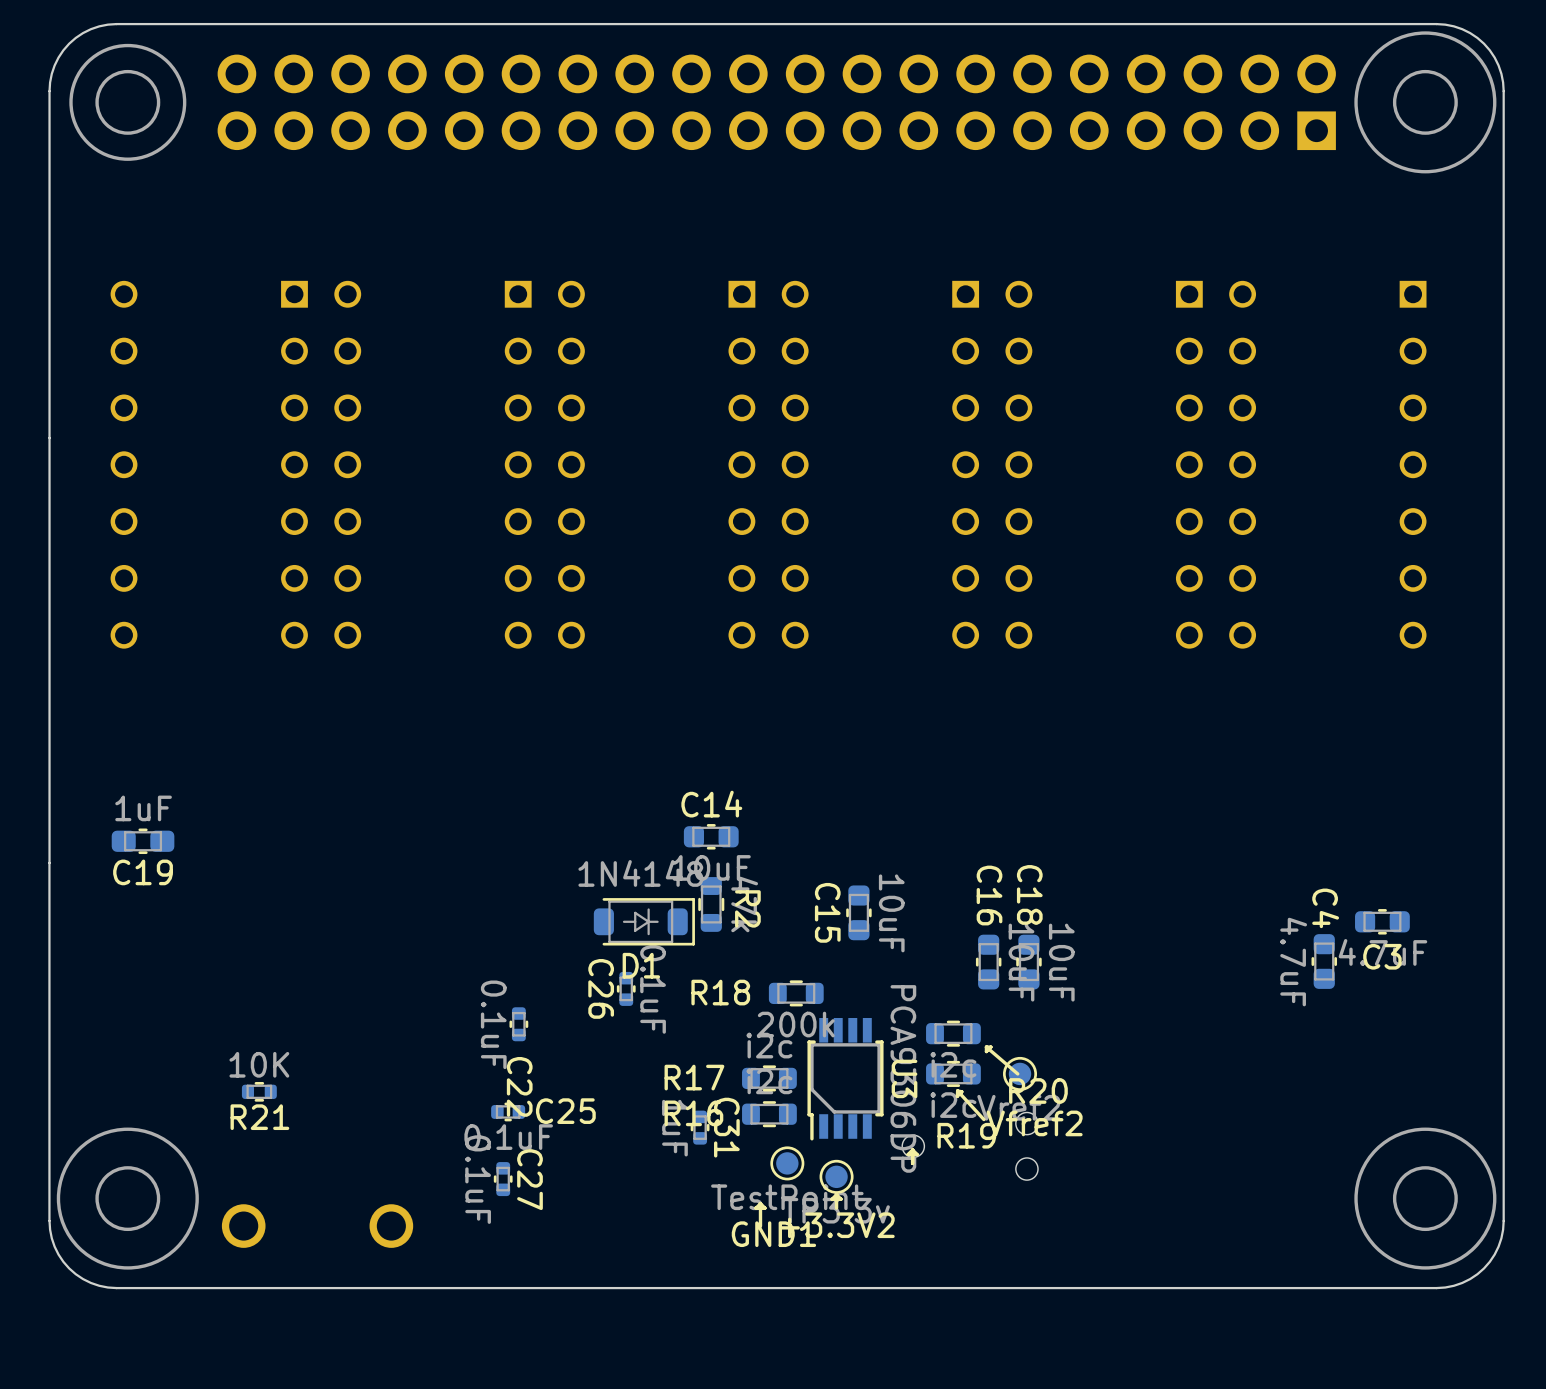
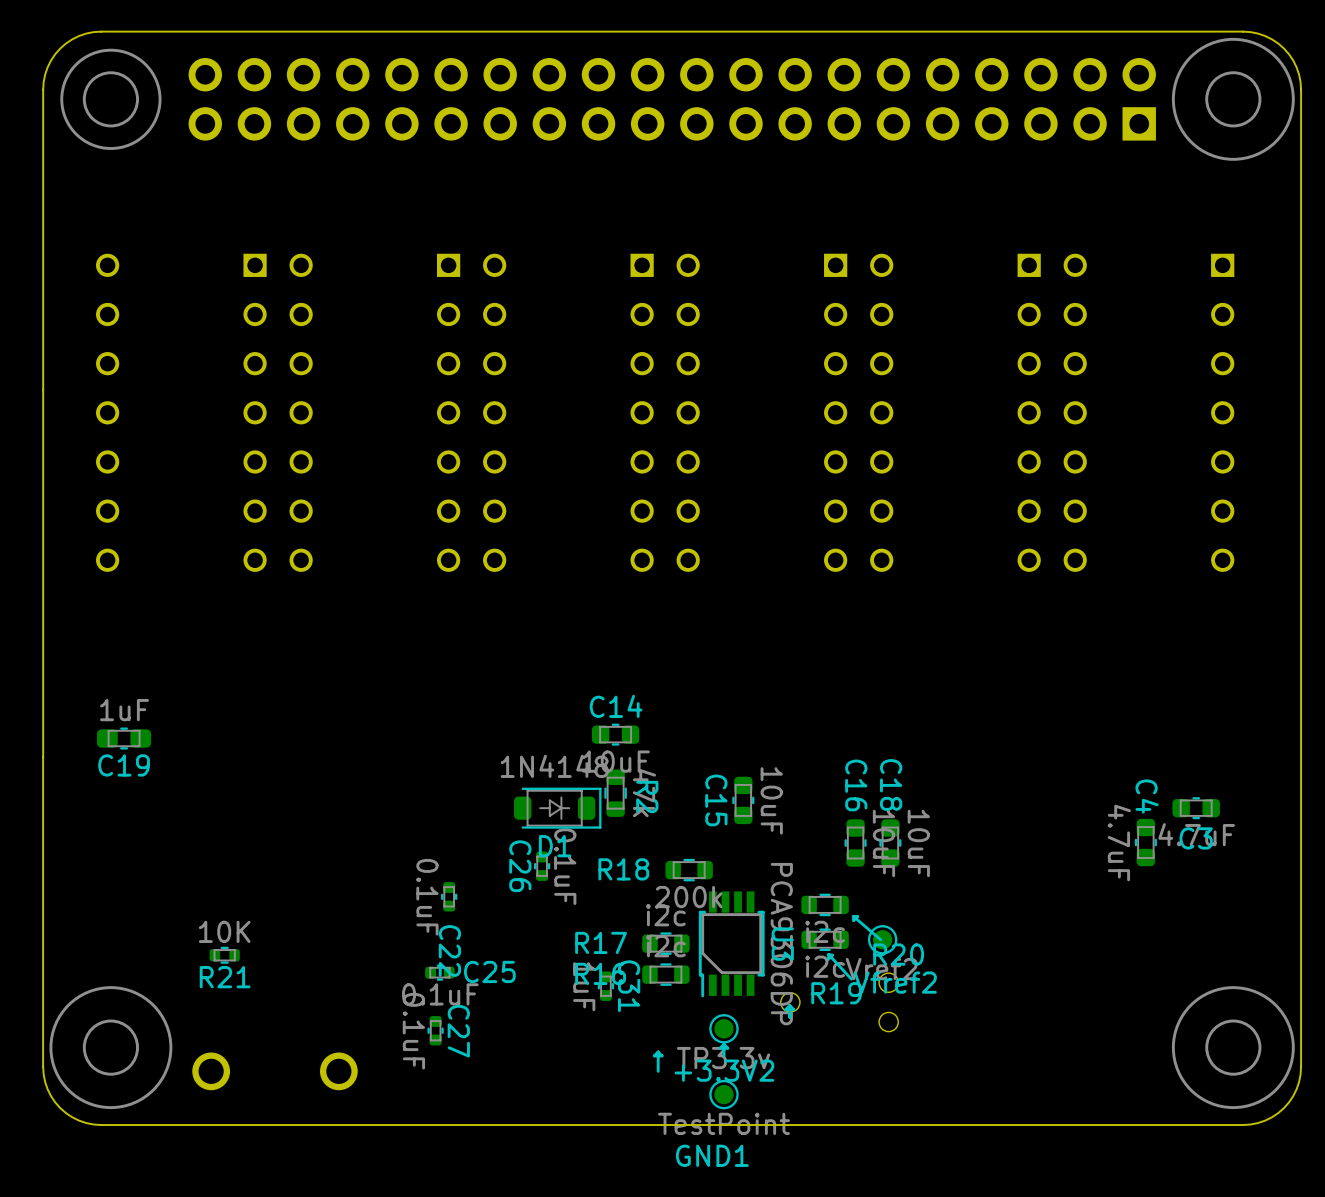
GND1 position: (787, 1163) -> (723, 1094)

